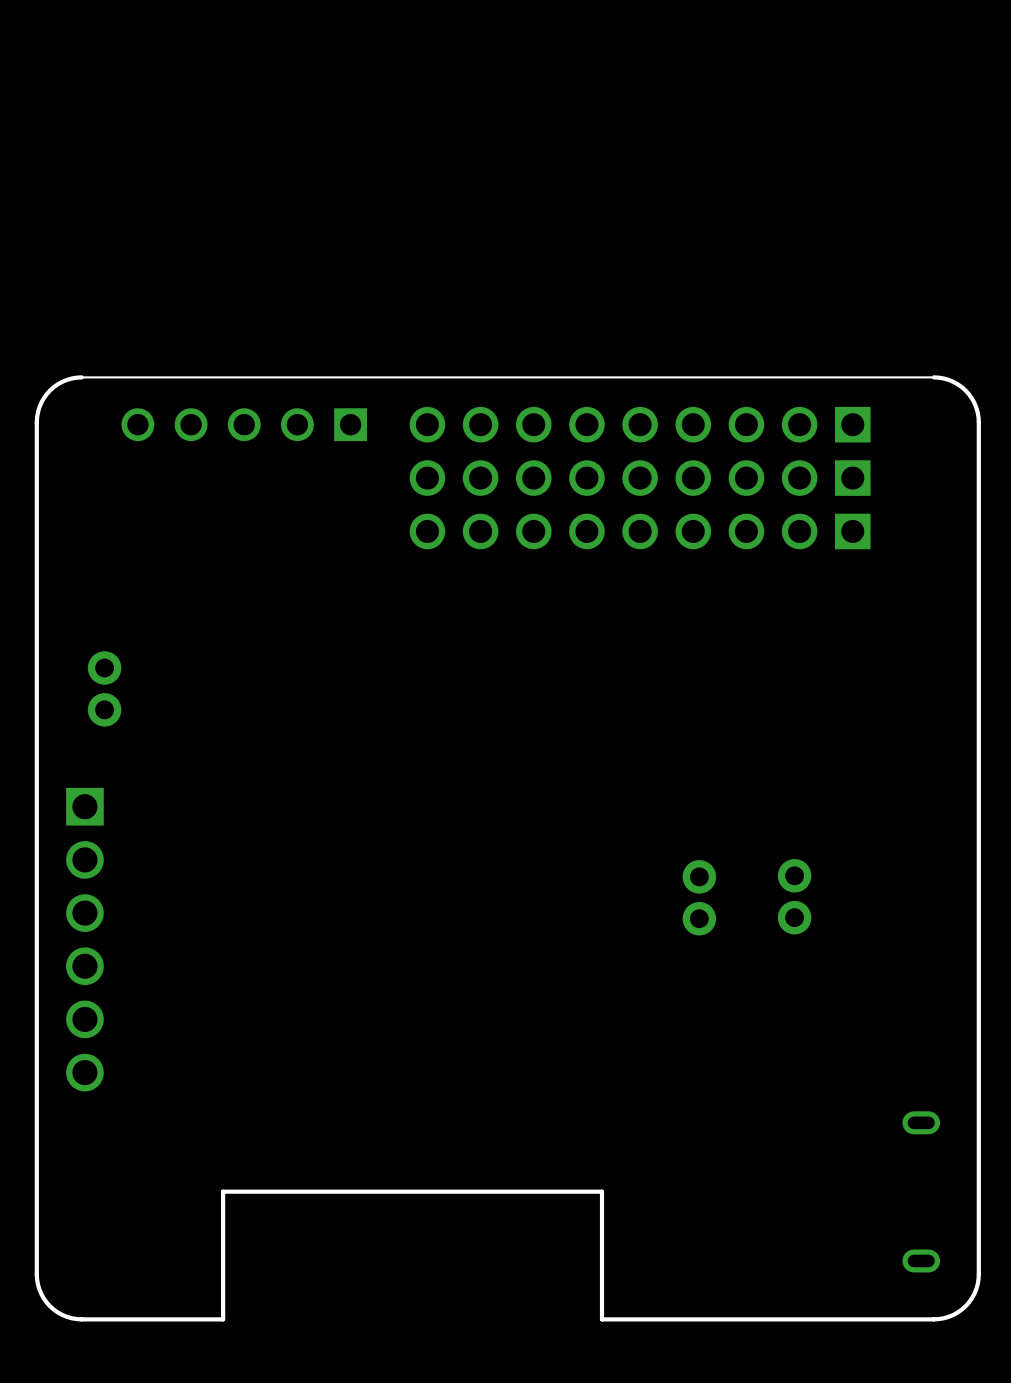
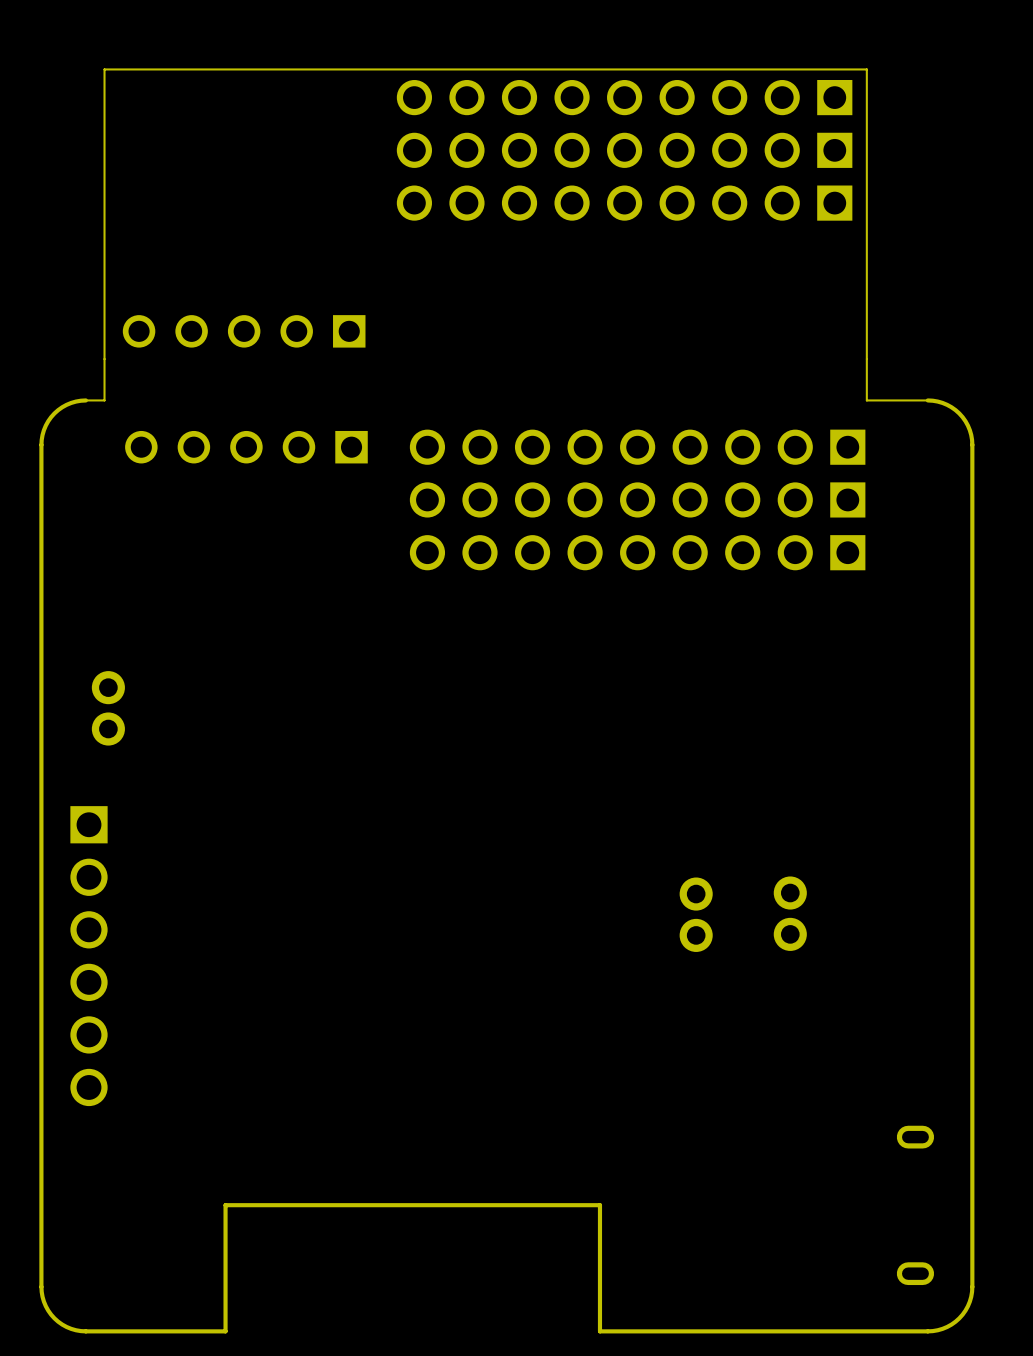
part: none -> (624, 97)
part: none -> (624, 150)
part: none -> (624, 203)
part: none -> (244, 331)
board edge: (872, 377) (100, 377) -> (866, 400) (866, 69) (104, 69) (104, 400)

